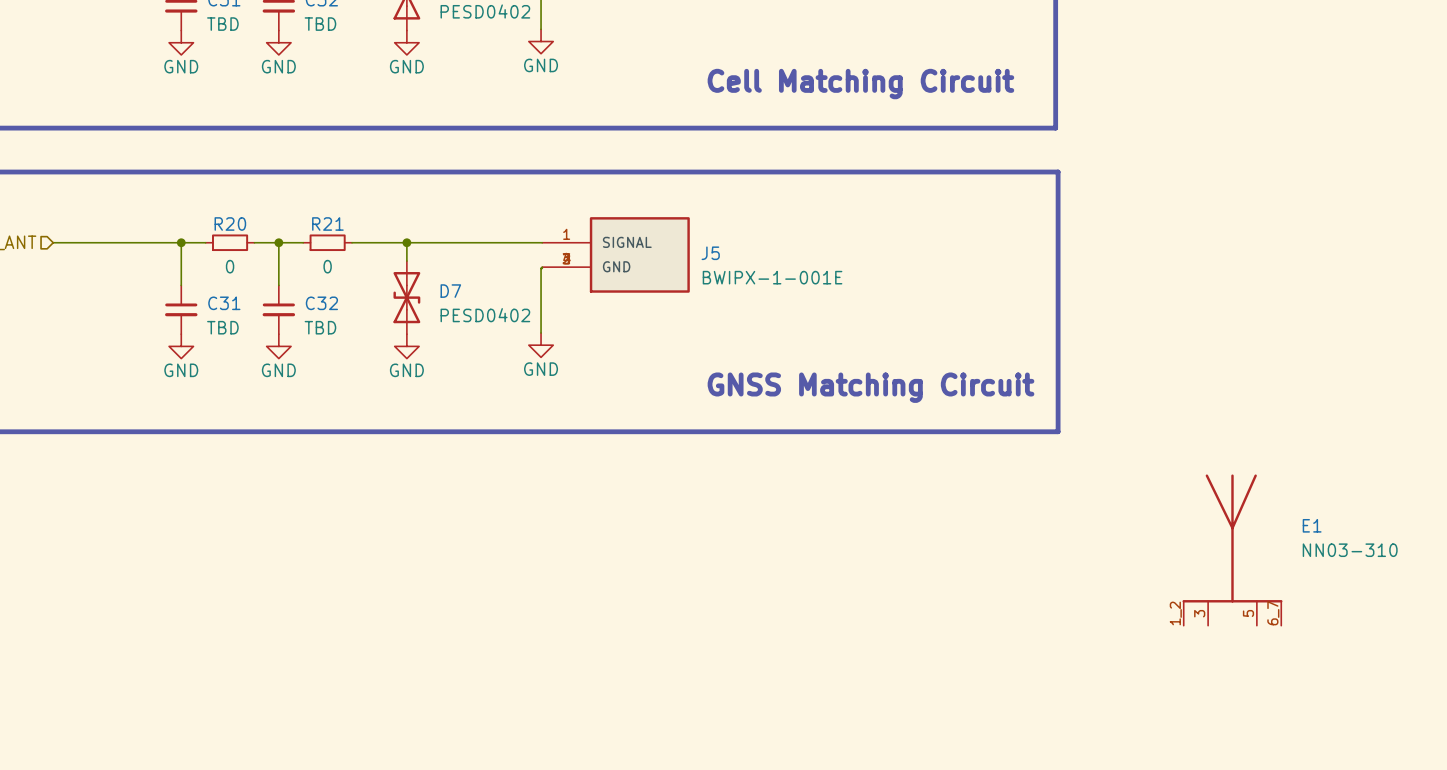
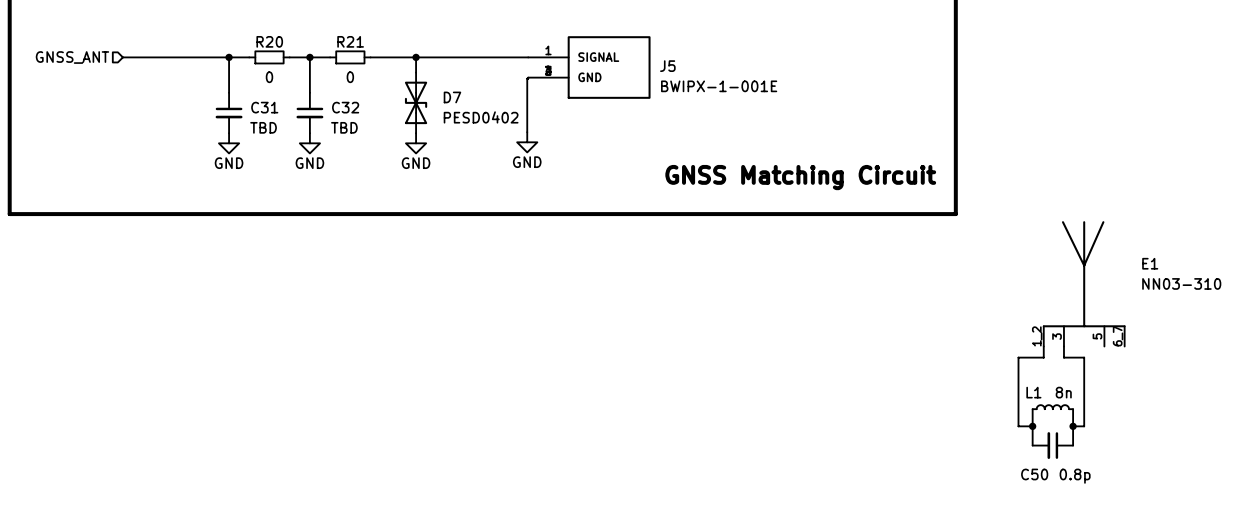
E1 position: (1232, 550) -> (1084, 283)
wire: none -> (1043, 346) (1043, 357) (1018, 357) (1018, 426) (1032, 426)
wire: none -> (1063, 346) (1063, 357) (1084, 357) (1084, 426) (1073, 426)
L1: none -> 8n (1052, 407)
wire: none -> (1032, 409) (1032, 445)
wire: none -> (1073, 409) (1073, 445)
junction: none -> (1032, 426)
junction: none -> (1073, 426)
C50: none -> 0.8p (1052, 445)

